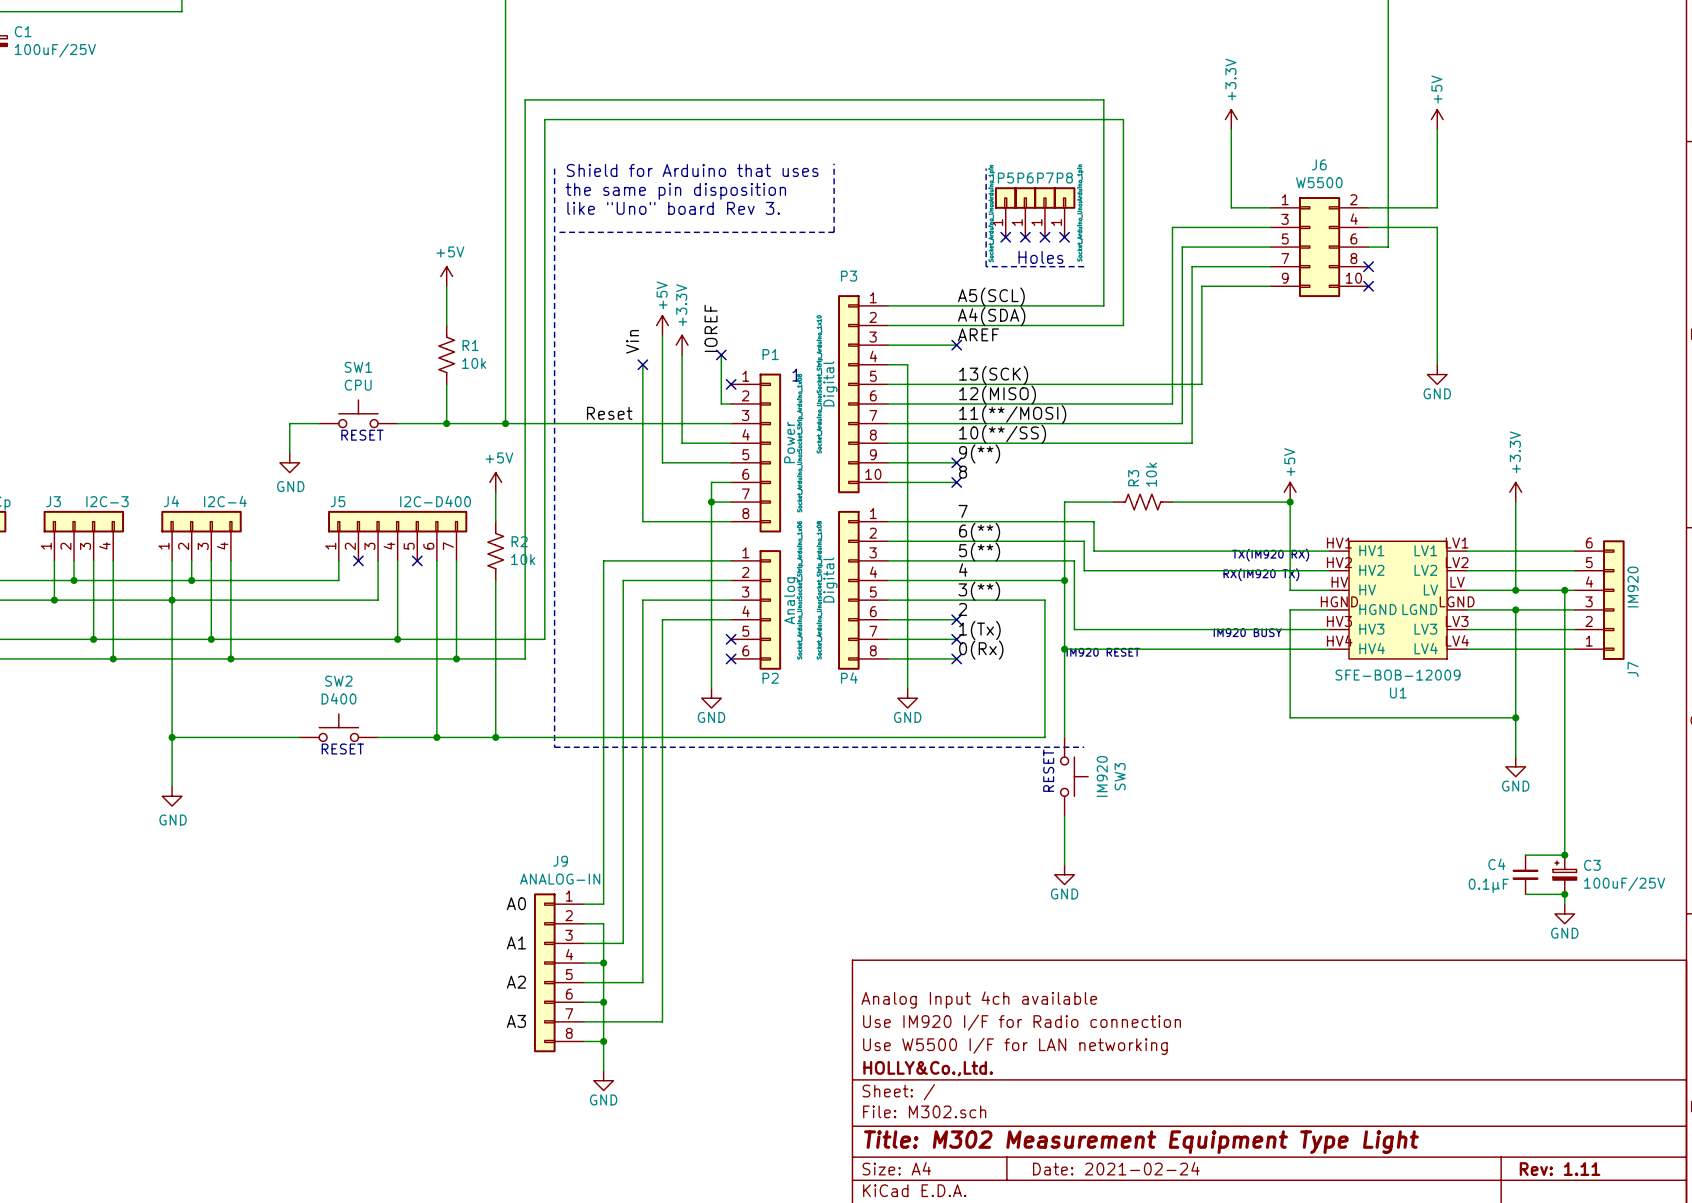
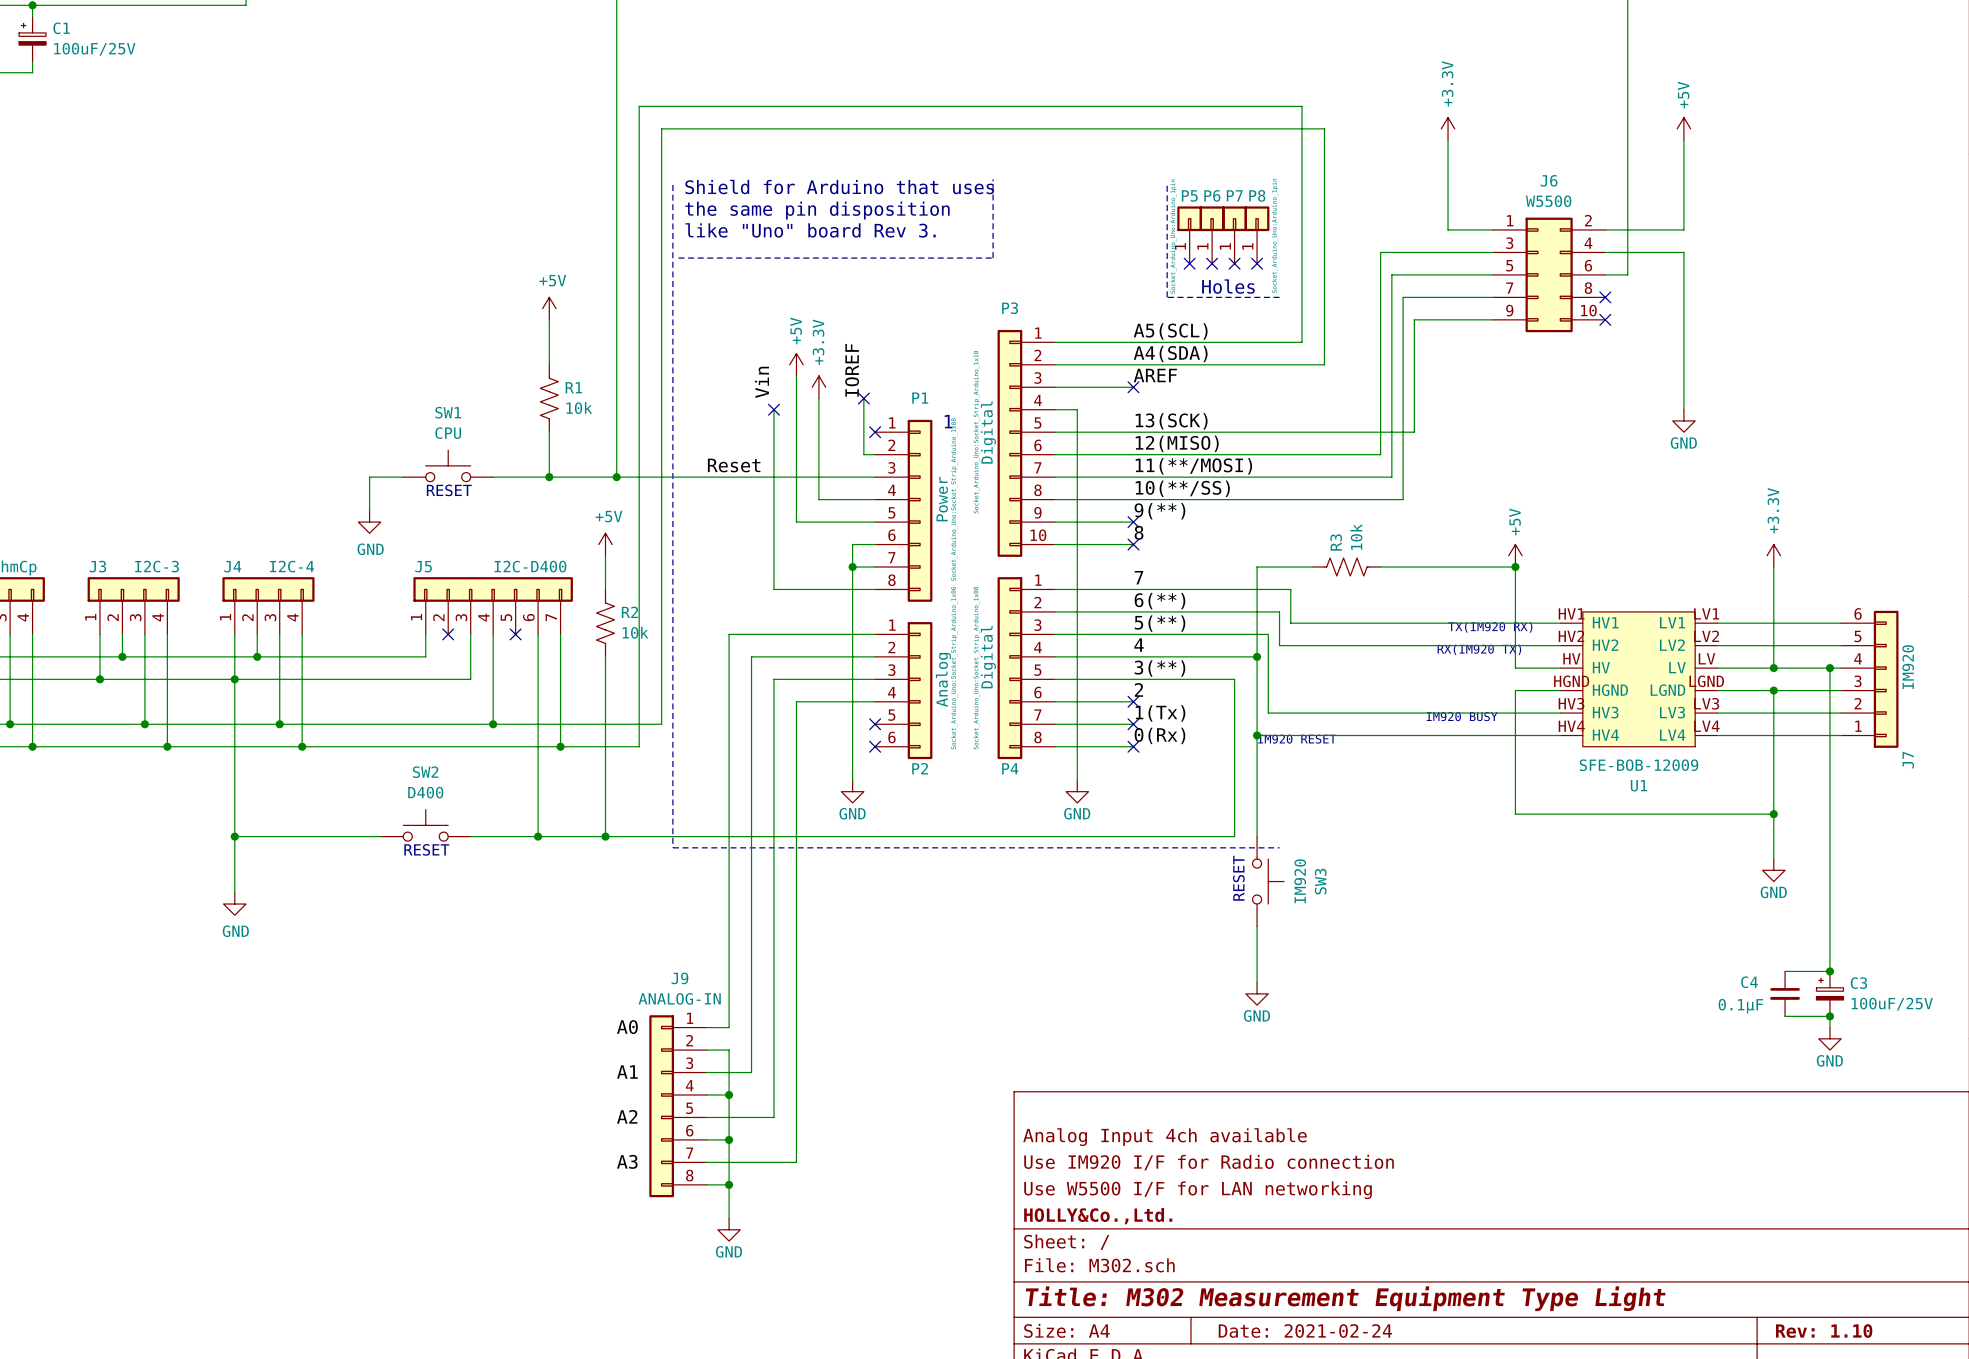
title block: Rev: 1.11 (1560, 1169) -> Rev: 1.10 (1824, 1331)

